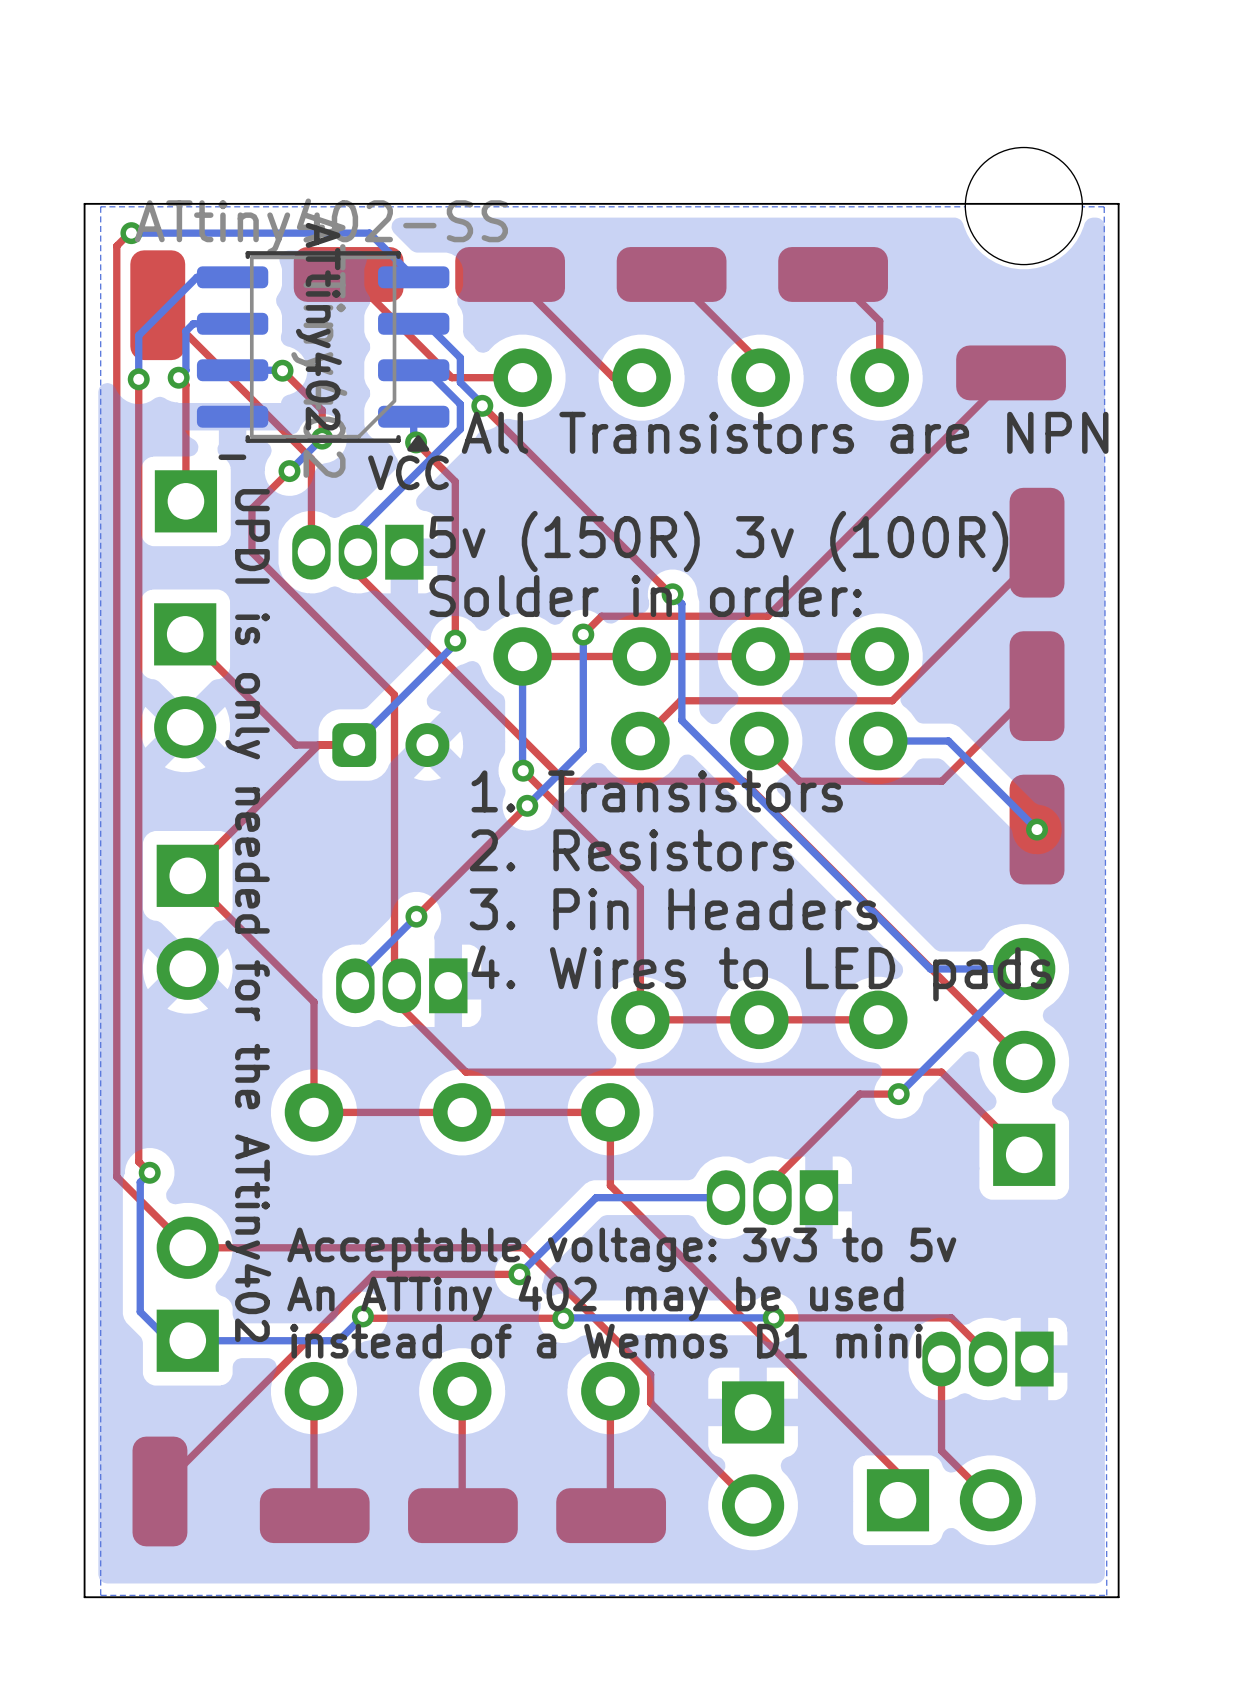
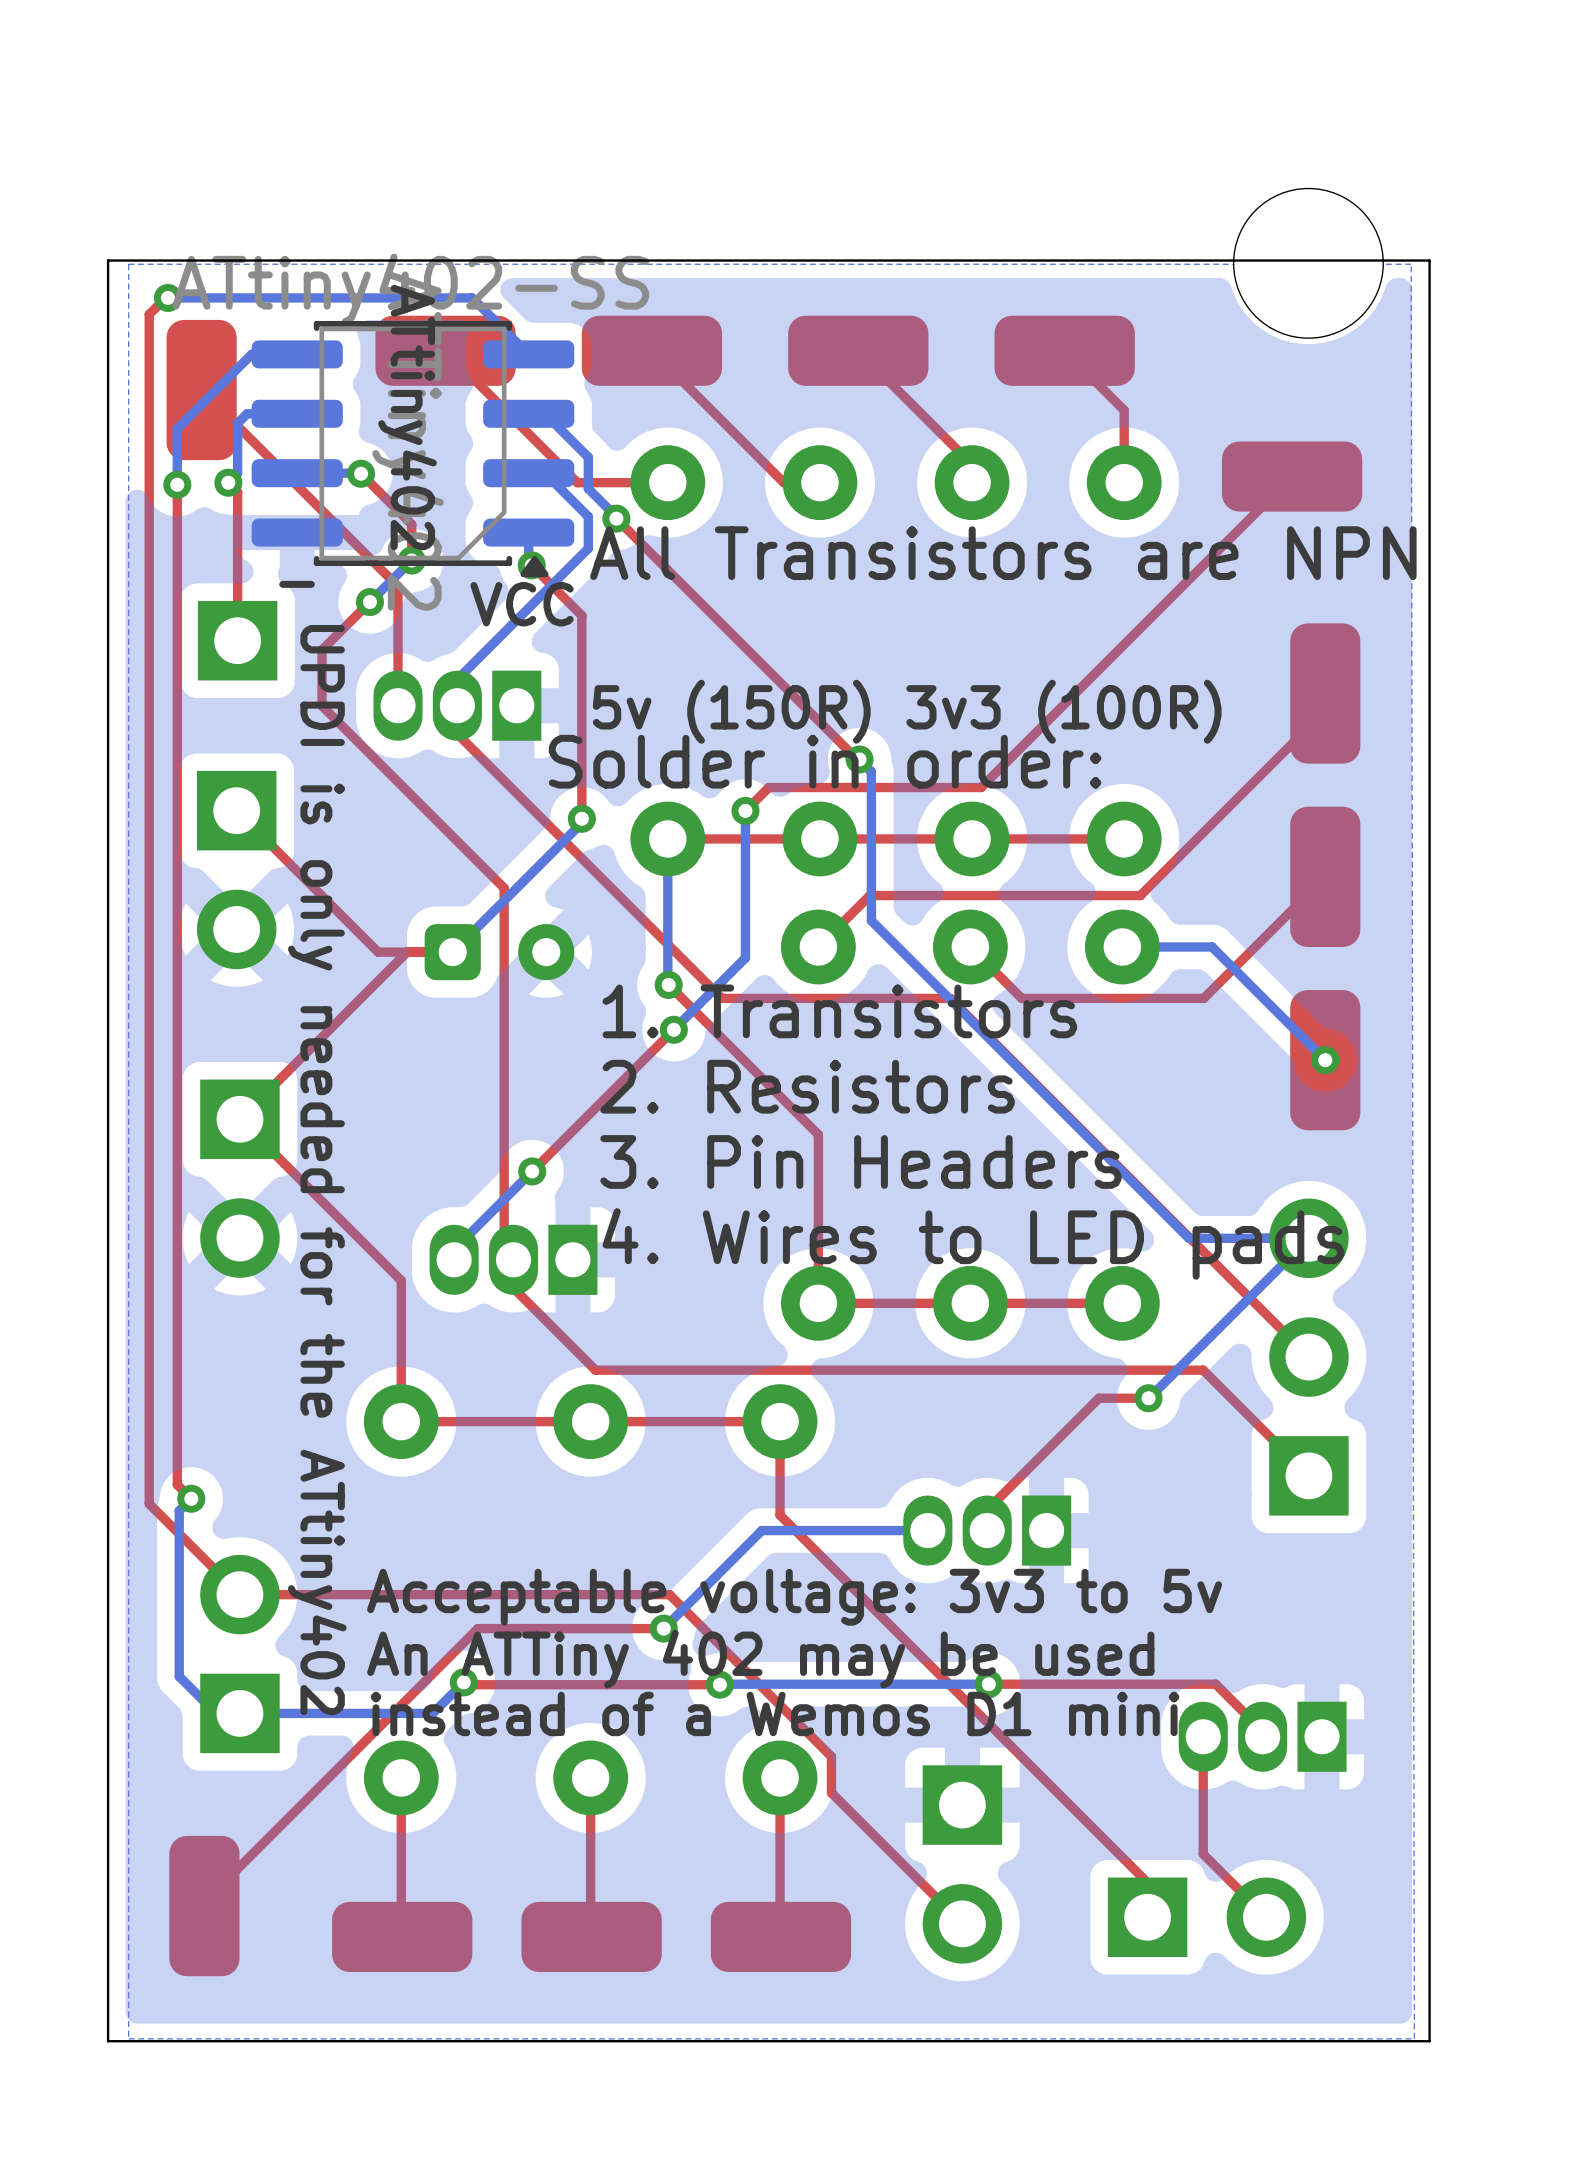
text: 5v (150R) 3v (100R) (718, 541) -> 5v (150R) 3v3 (100R) (907, 711)

